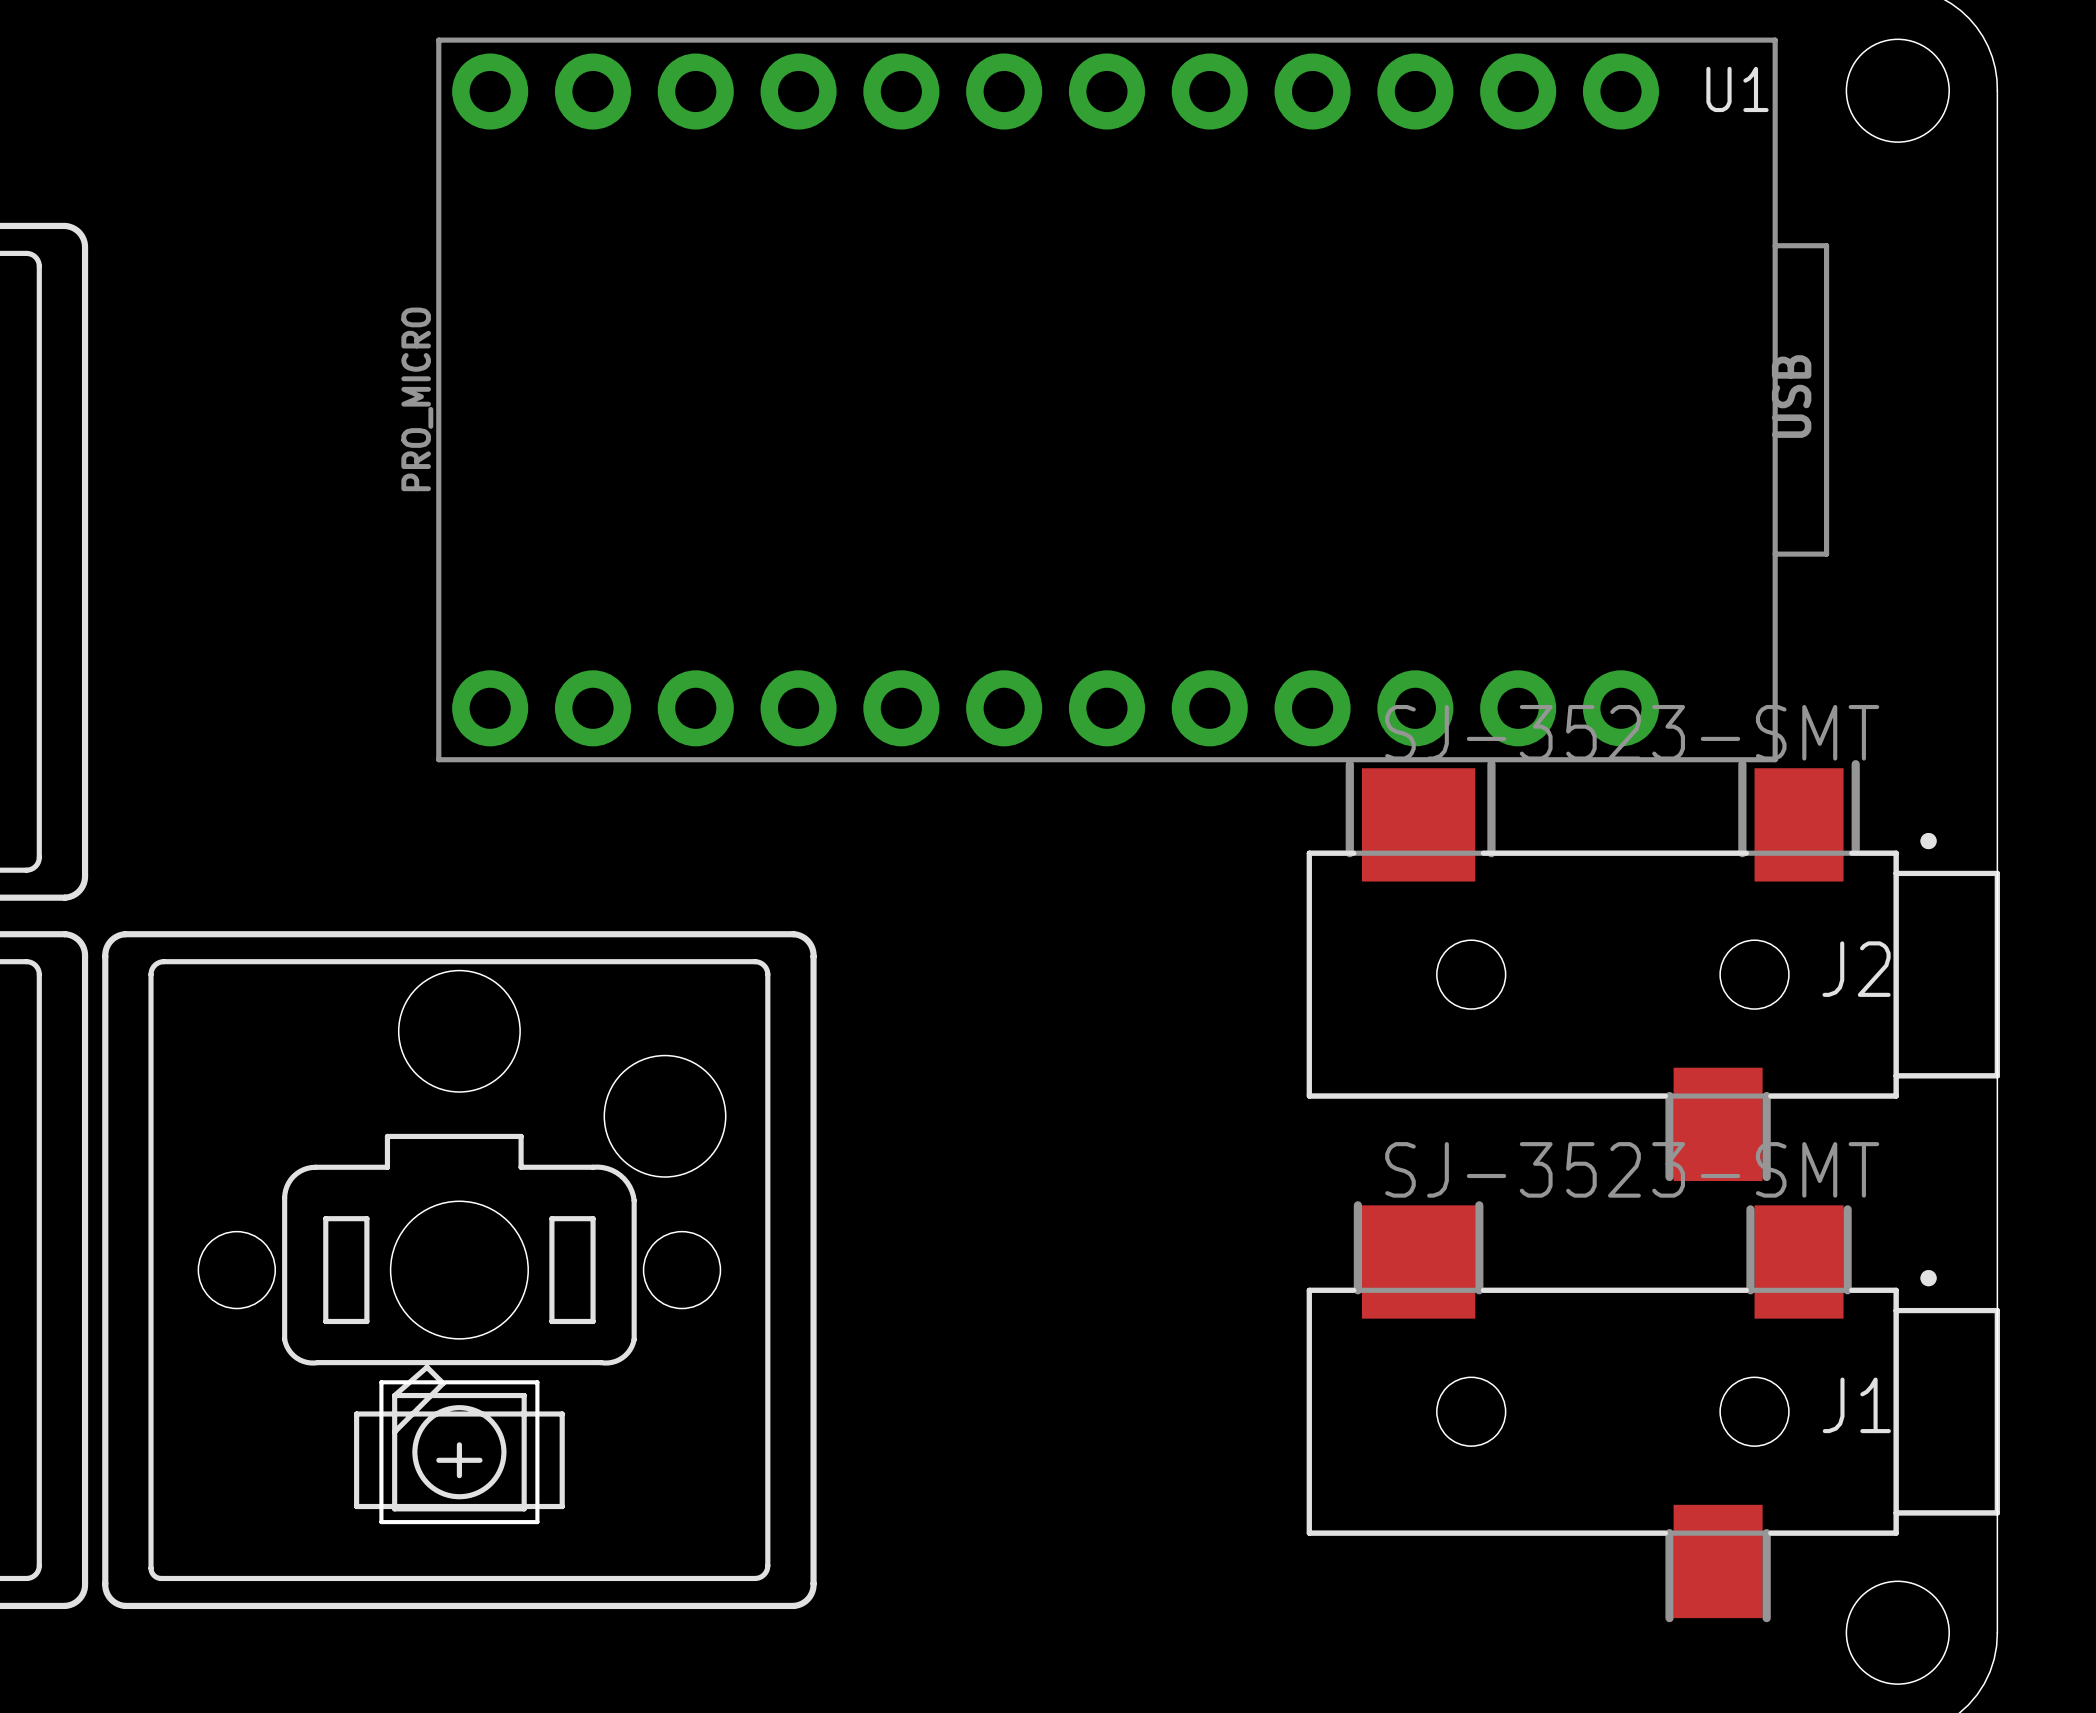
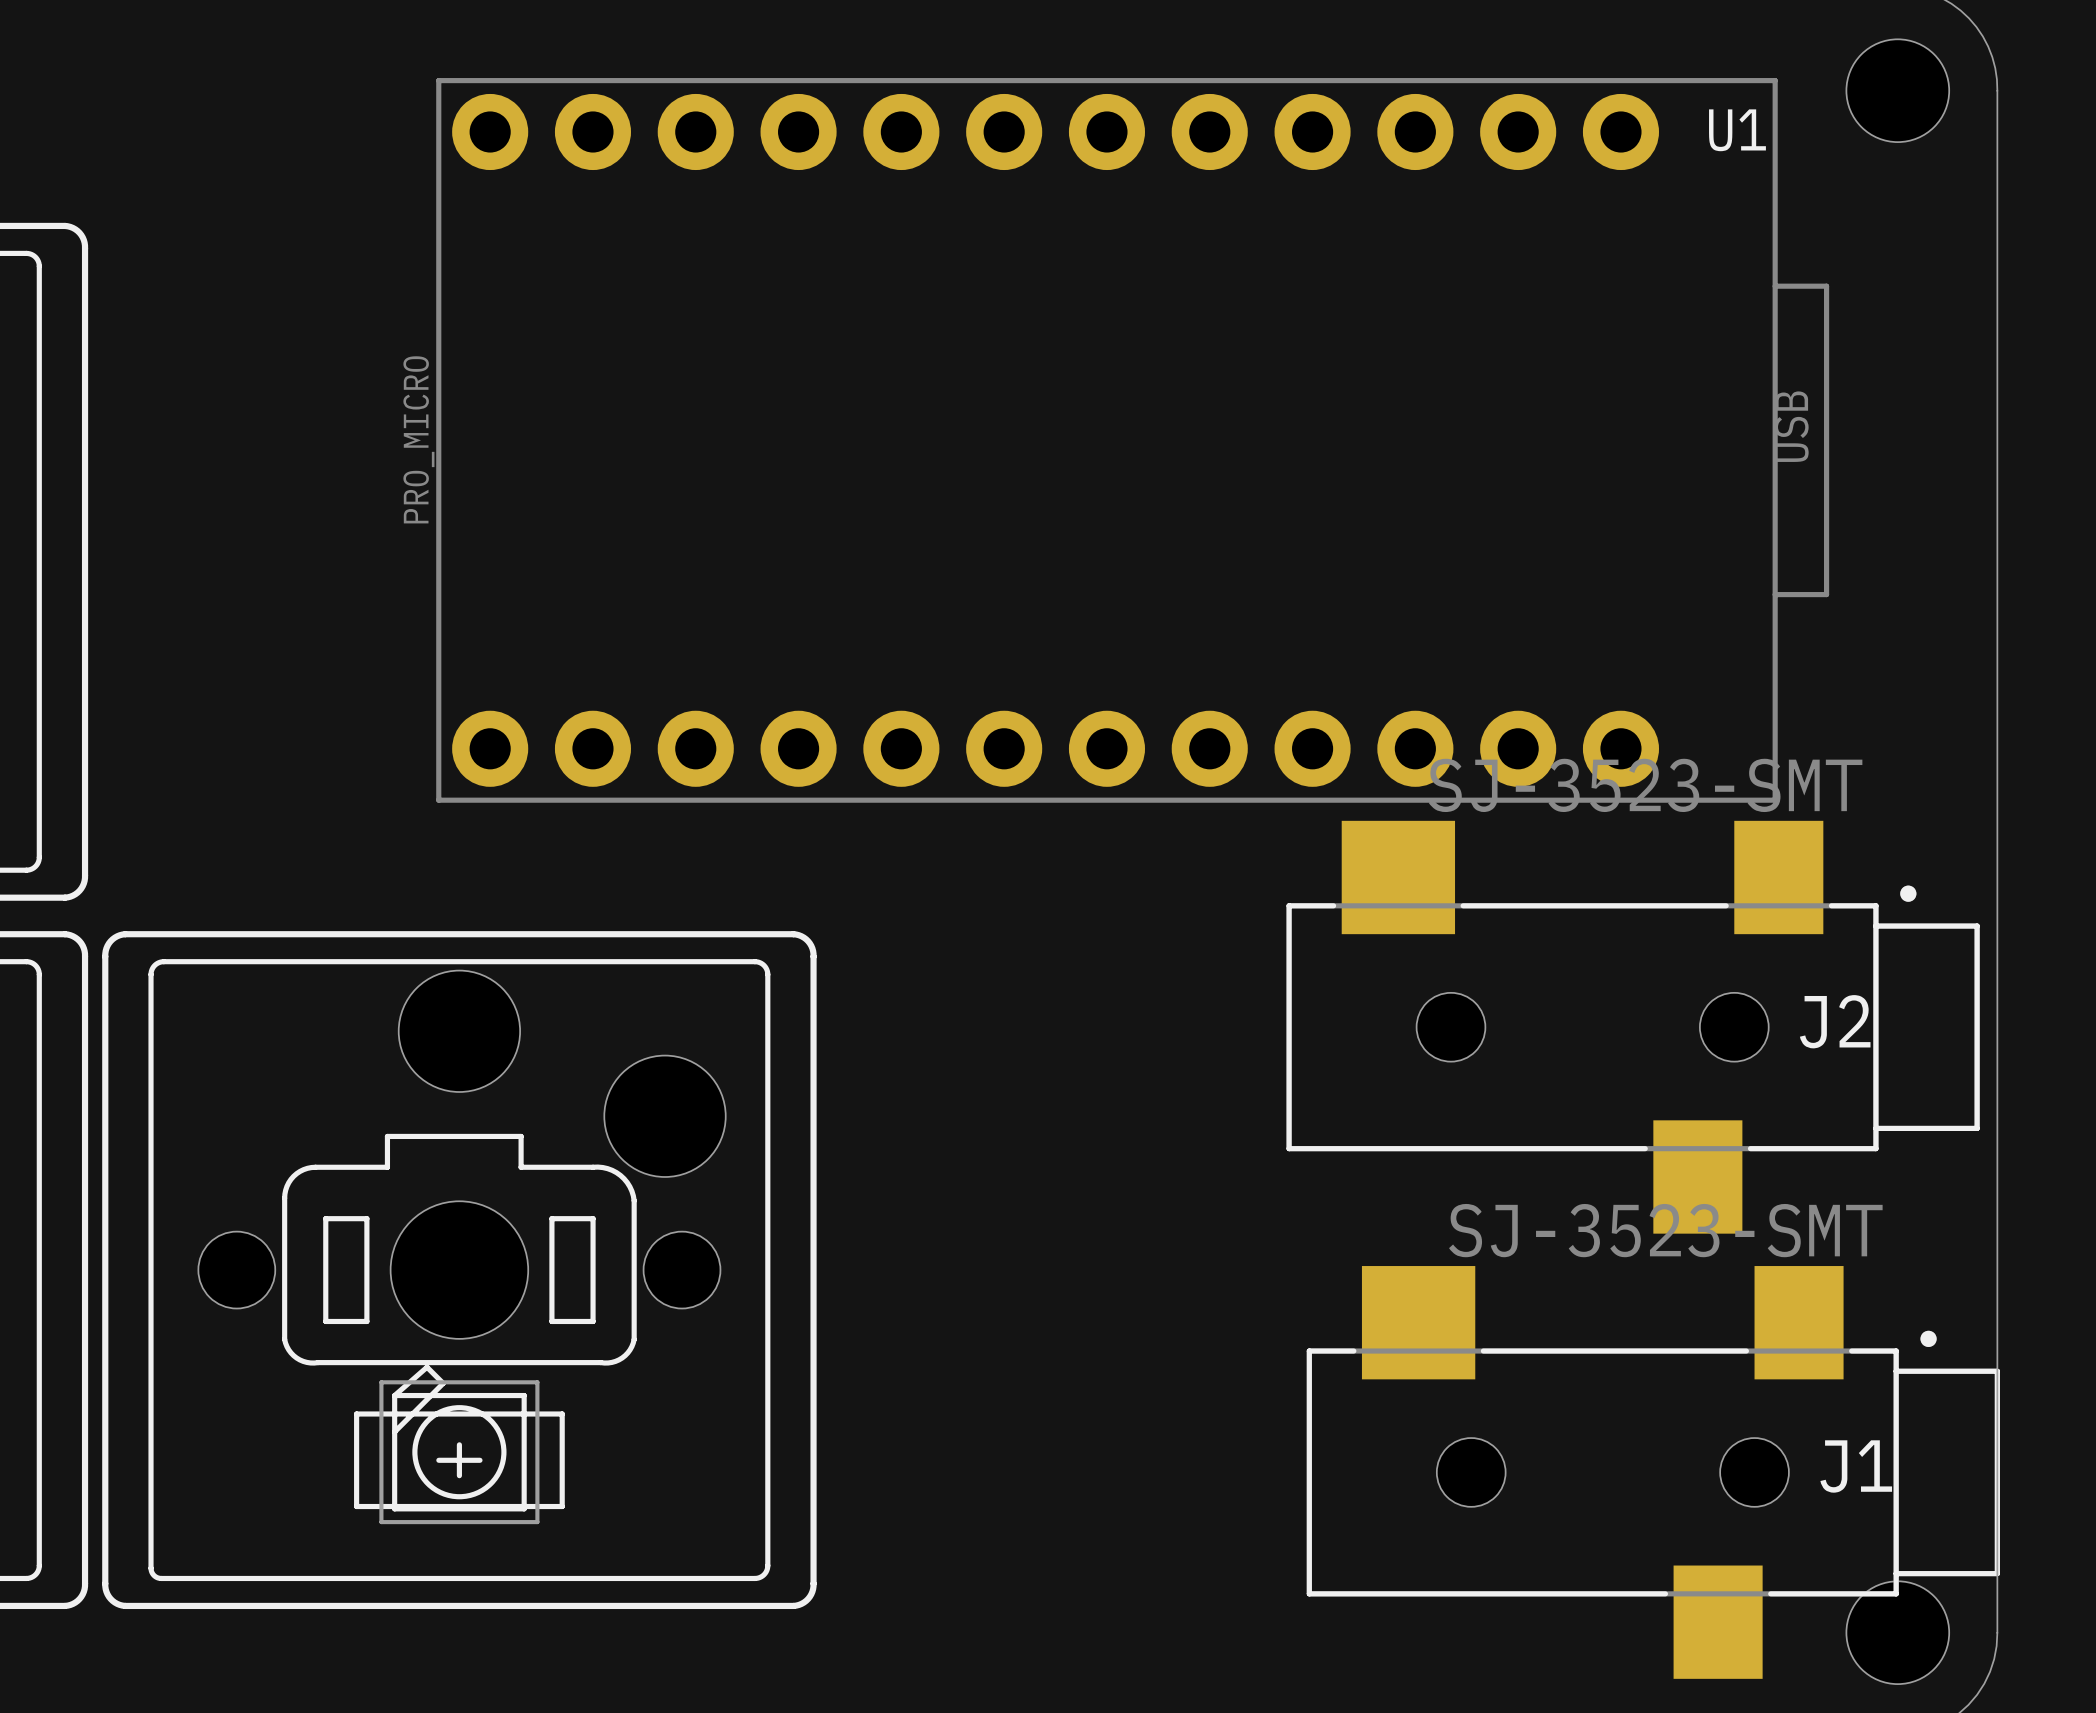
U1 position: (1132, 399) -> (1132, 440)
line: (1349, 764) (1349, 853) -> none
line: (1491, 764) (1491, 853) -> none
line: (1742, 764) (1742, 853) -> none
line: (1855, 764) (1855, 849) -> none
J2 position: (1653, 974) -> (1633, 1027)
line: (1669, 1096) (1669, 1176) -> none
line: (1766, 1096) (1766, 1176) -> none
line: (1357, 1205) (1357, 1290) -> none
line: (1479, 1205) (1479, 1290) -> none
line: (1750, 1209) (1750, 1290) -> none
line: (1847, 1209) (1847, 1290) -> none
J1 position: (1653, 1411) -> (1653, 1472)
line: (1669, 1533) (1669, 1618) -> none
line: (1766, 1533) (1766, 1618) -> none

